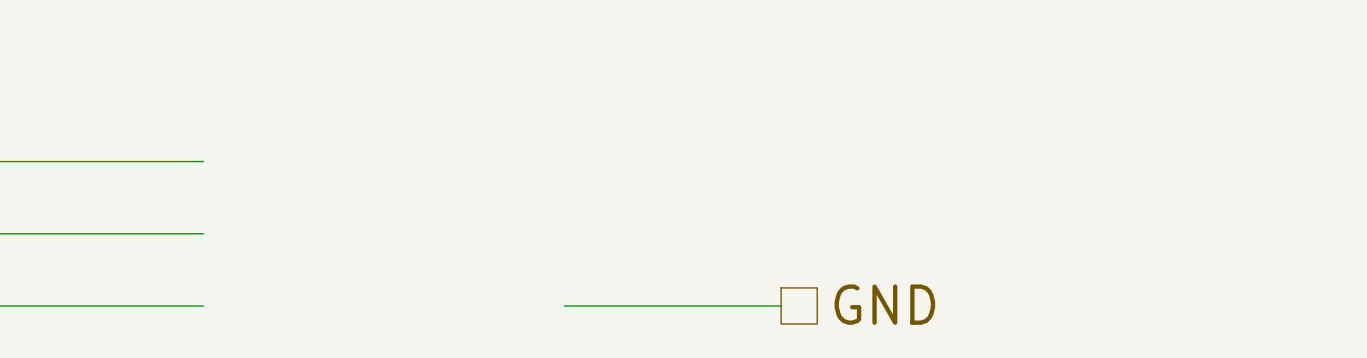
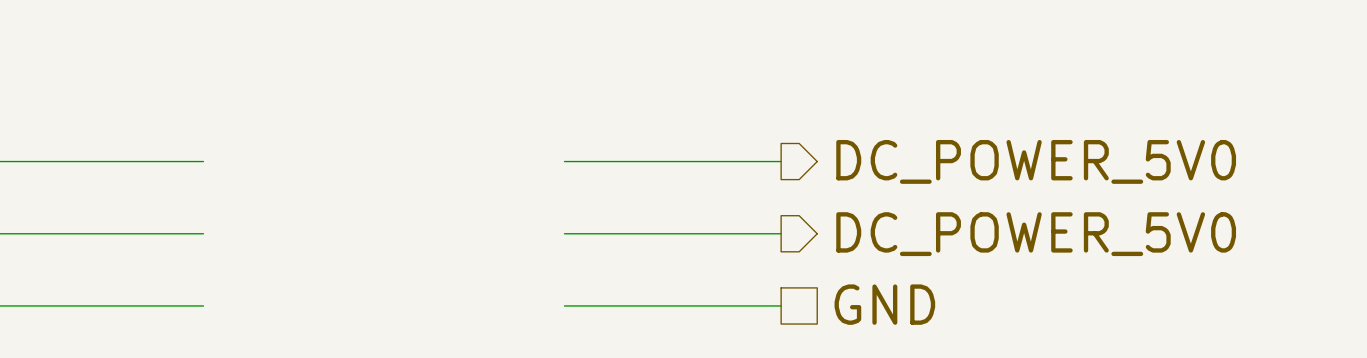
wire: none -> (564, 161) (781, 161)
hierarchical label: none -> DC_POWER_5V0 (1036, 161)
wire: none -> (564, 233) (781, 233)
hierarchical label: none -> DC_POWER_5V0 (1036, 234)

